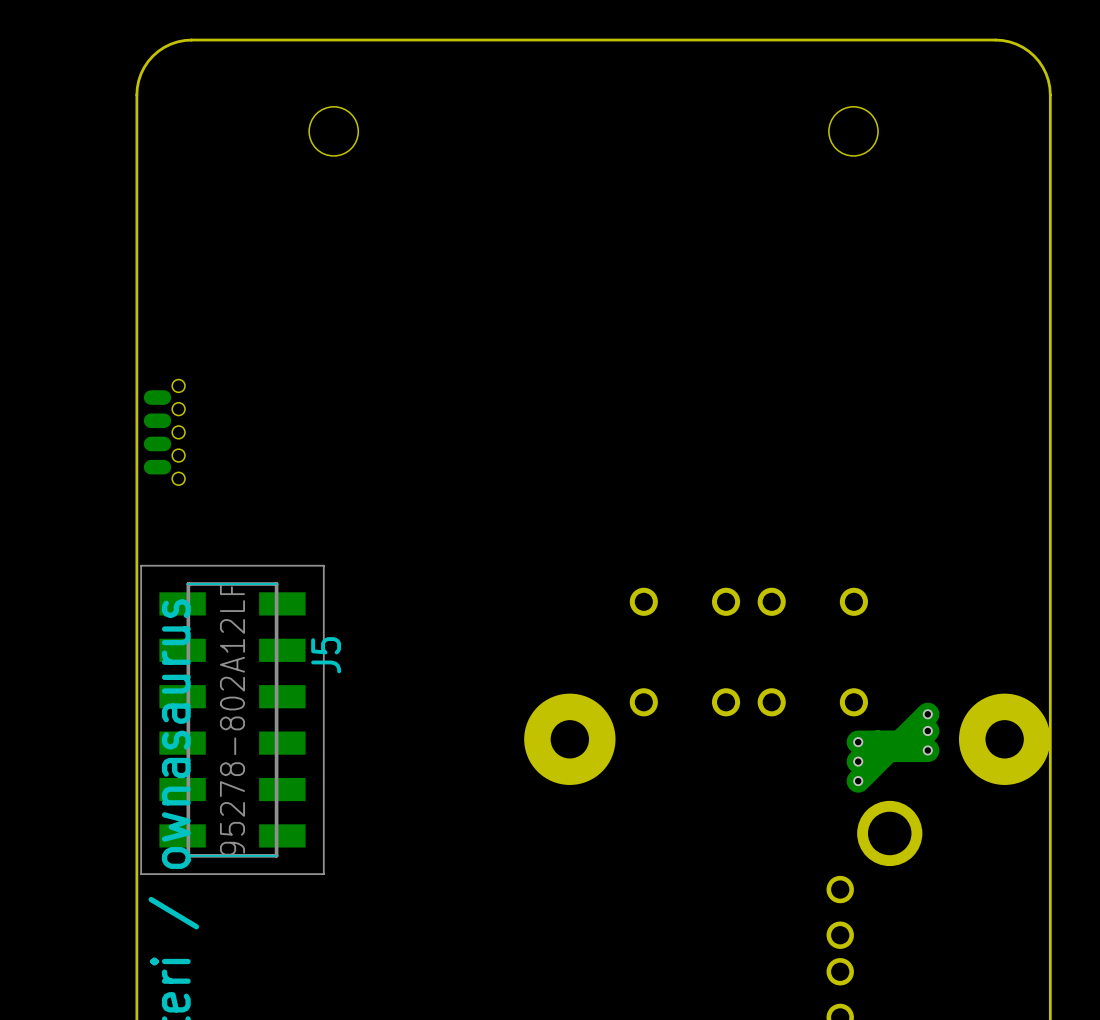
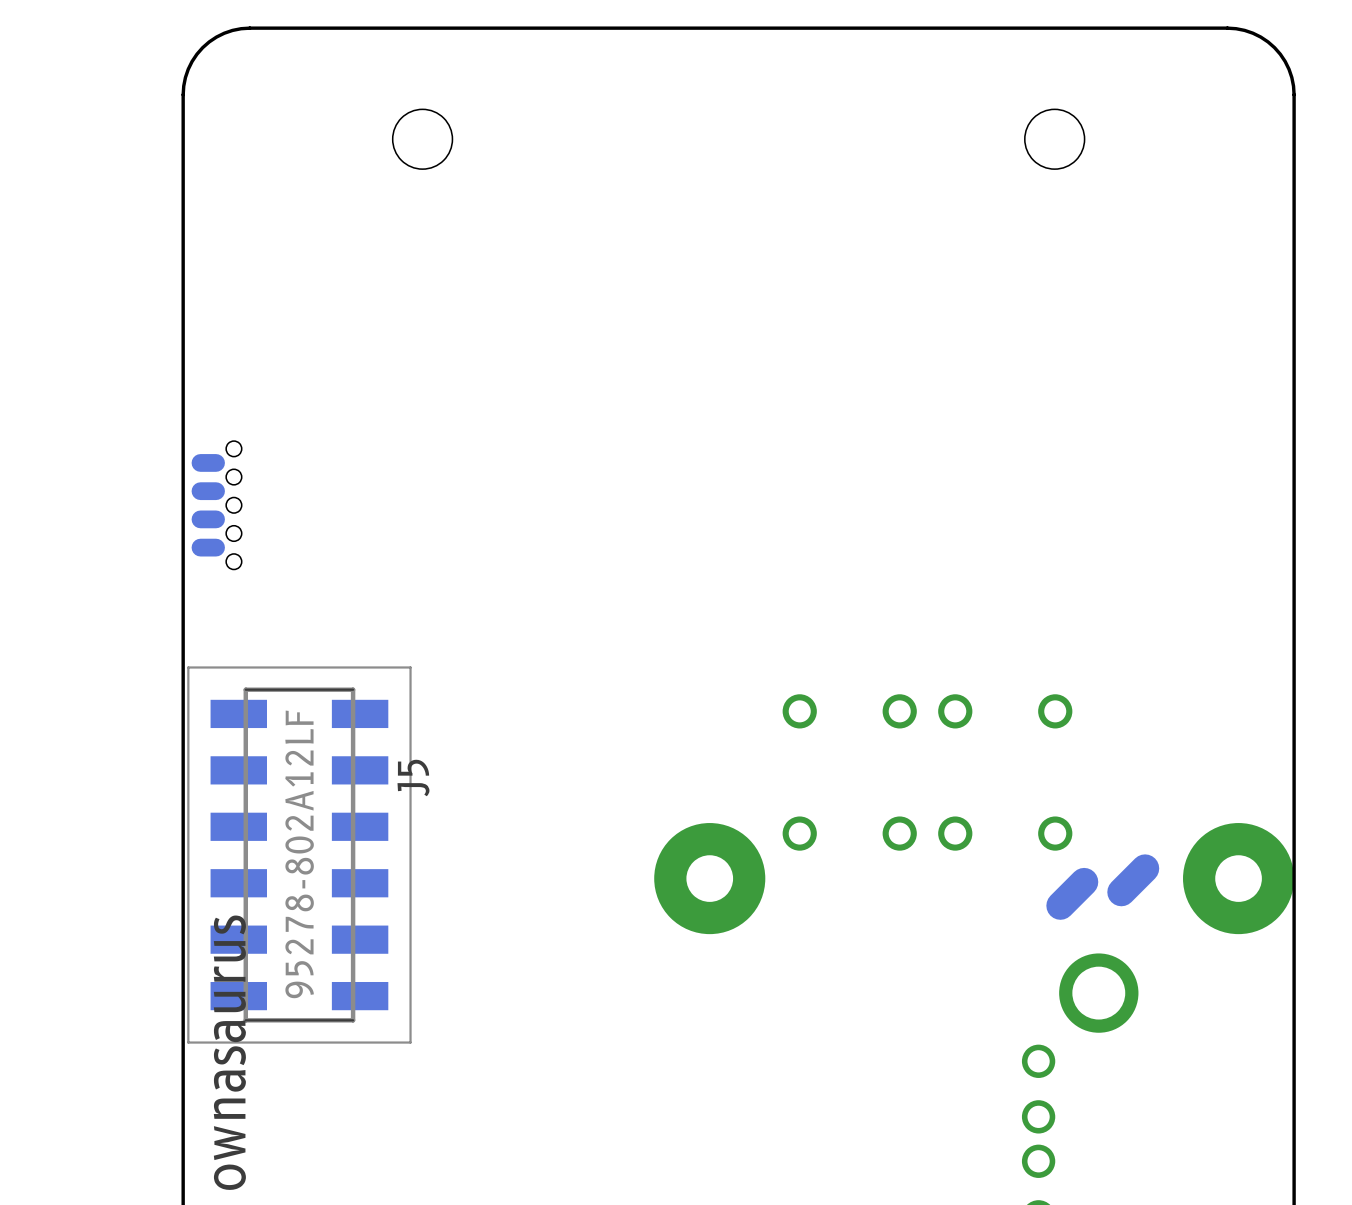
track: (927, 714) (899, 742) (858, 742) -> none
via: (927, 714) -> none
via: (927, 730) -> none
via: (858, 742) -> none
track: (927, 750) (888, 750) (858, 781) -> none
via: (927, 750) -> none
via: (858, 761) -> none
via: (858, 781) -> none

